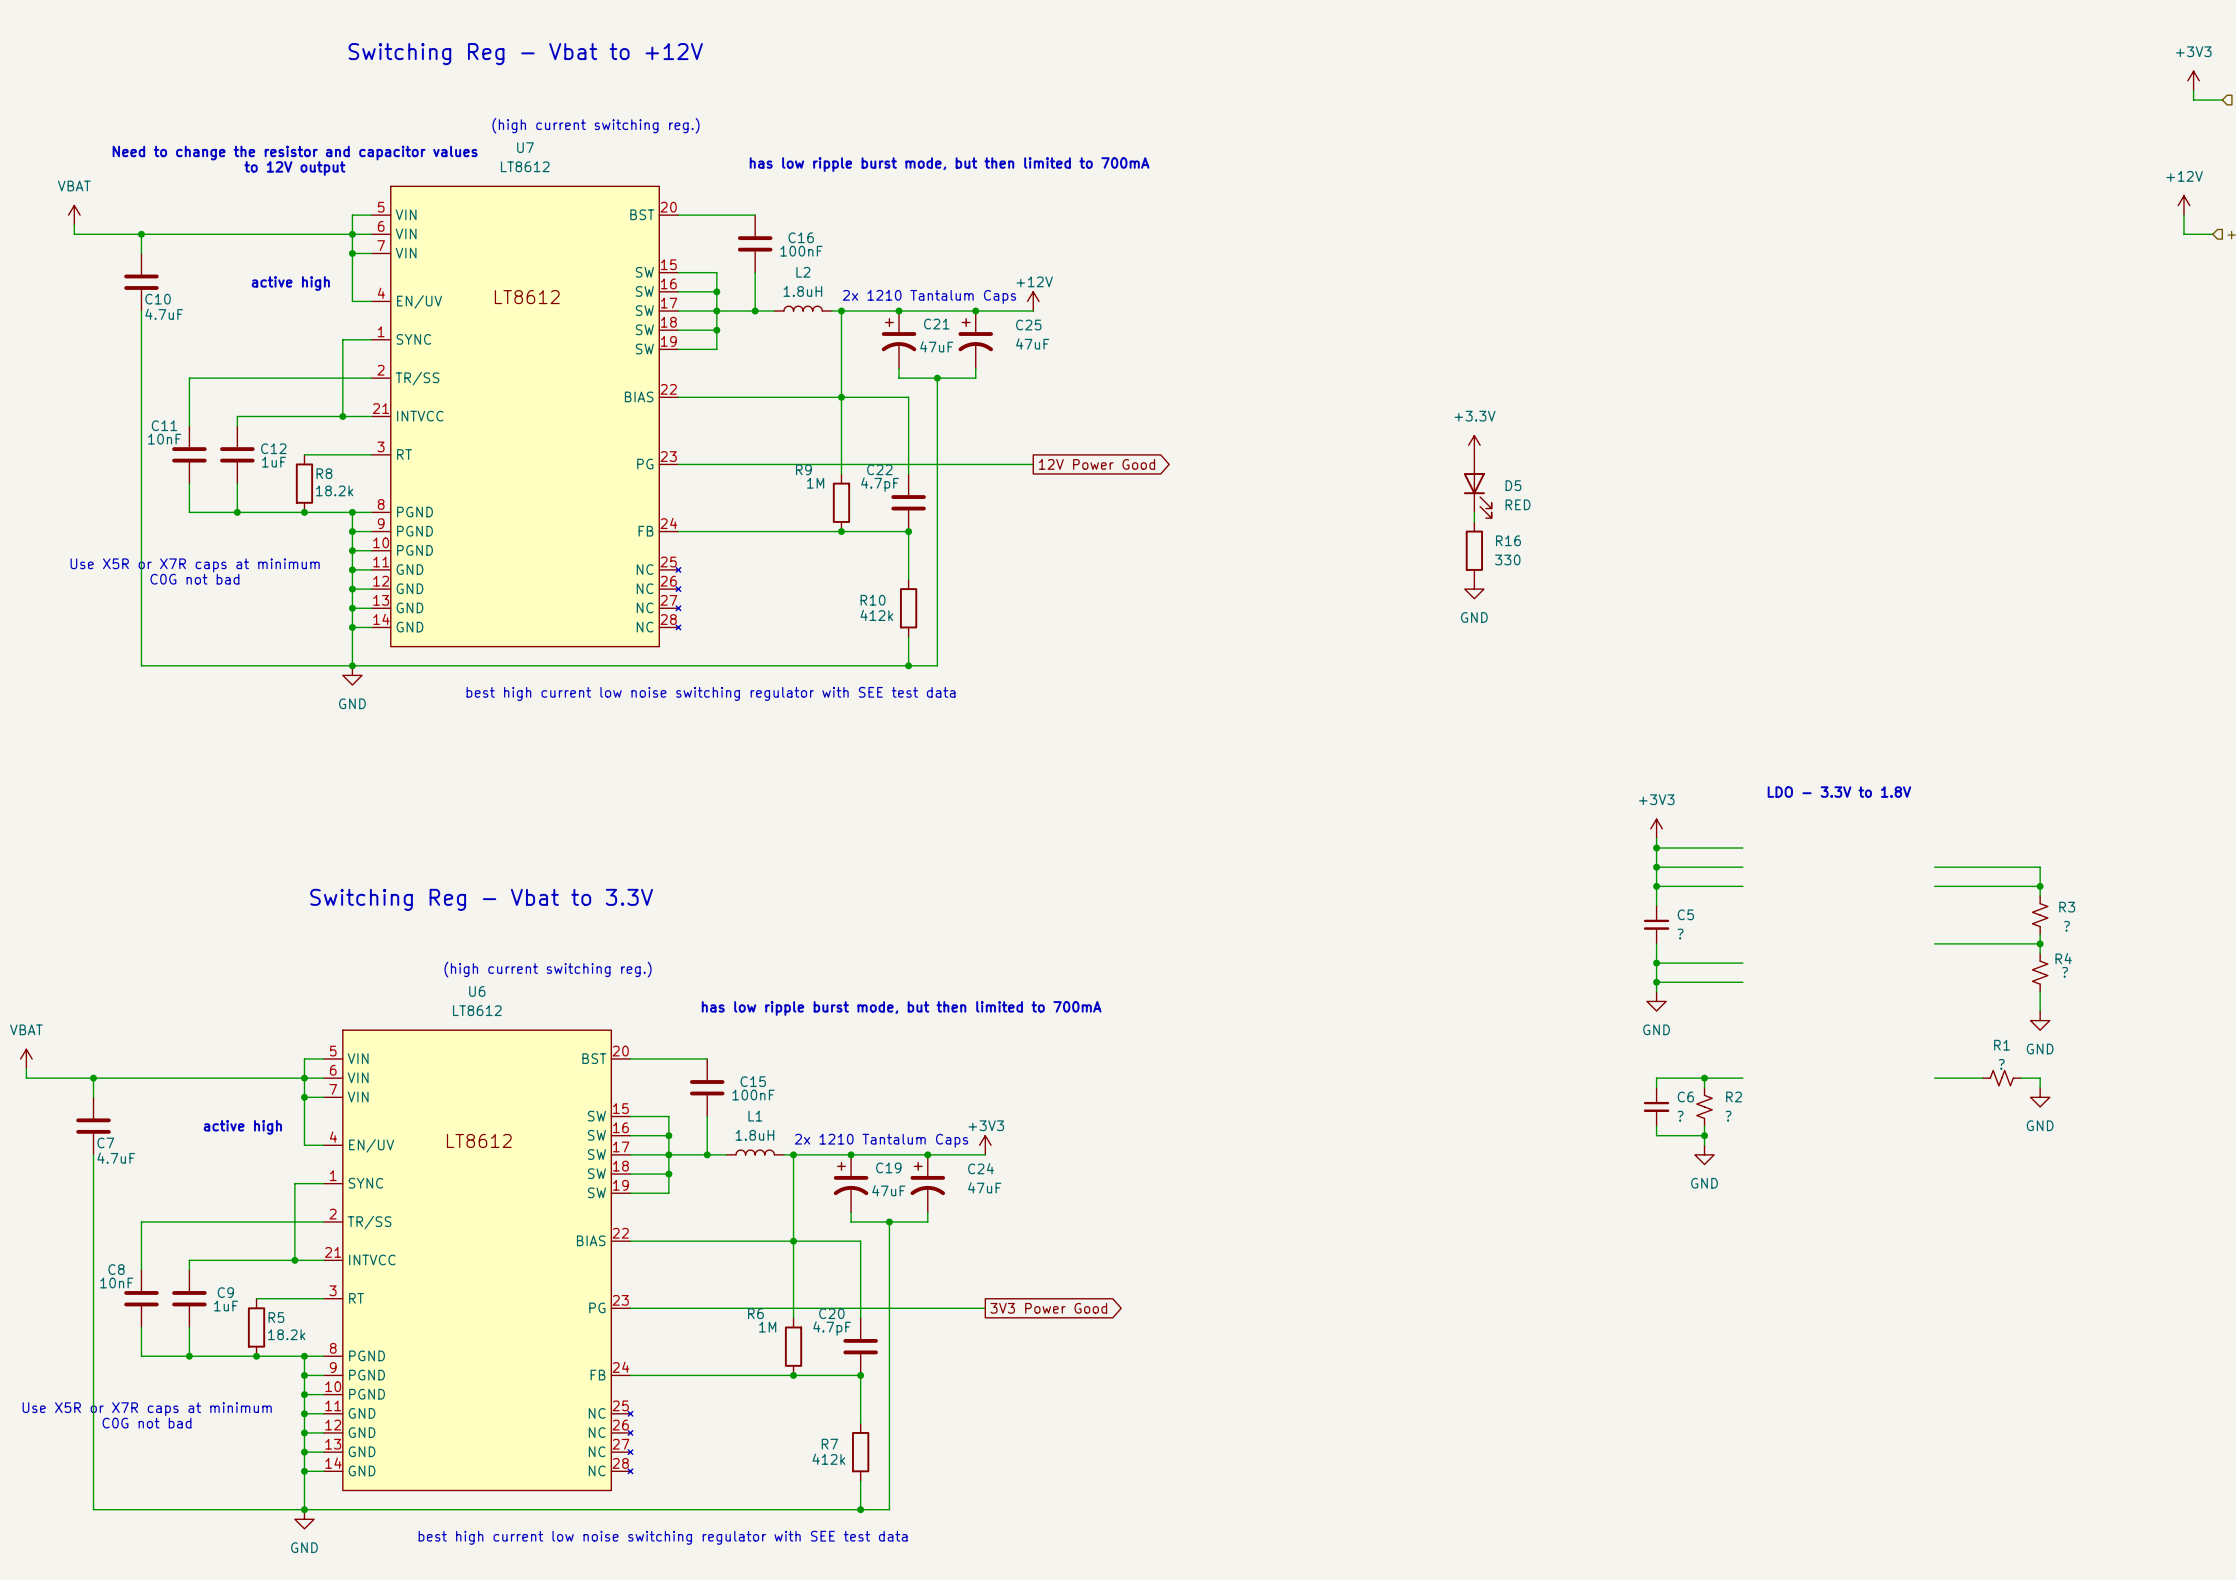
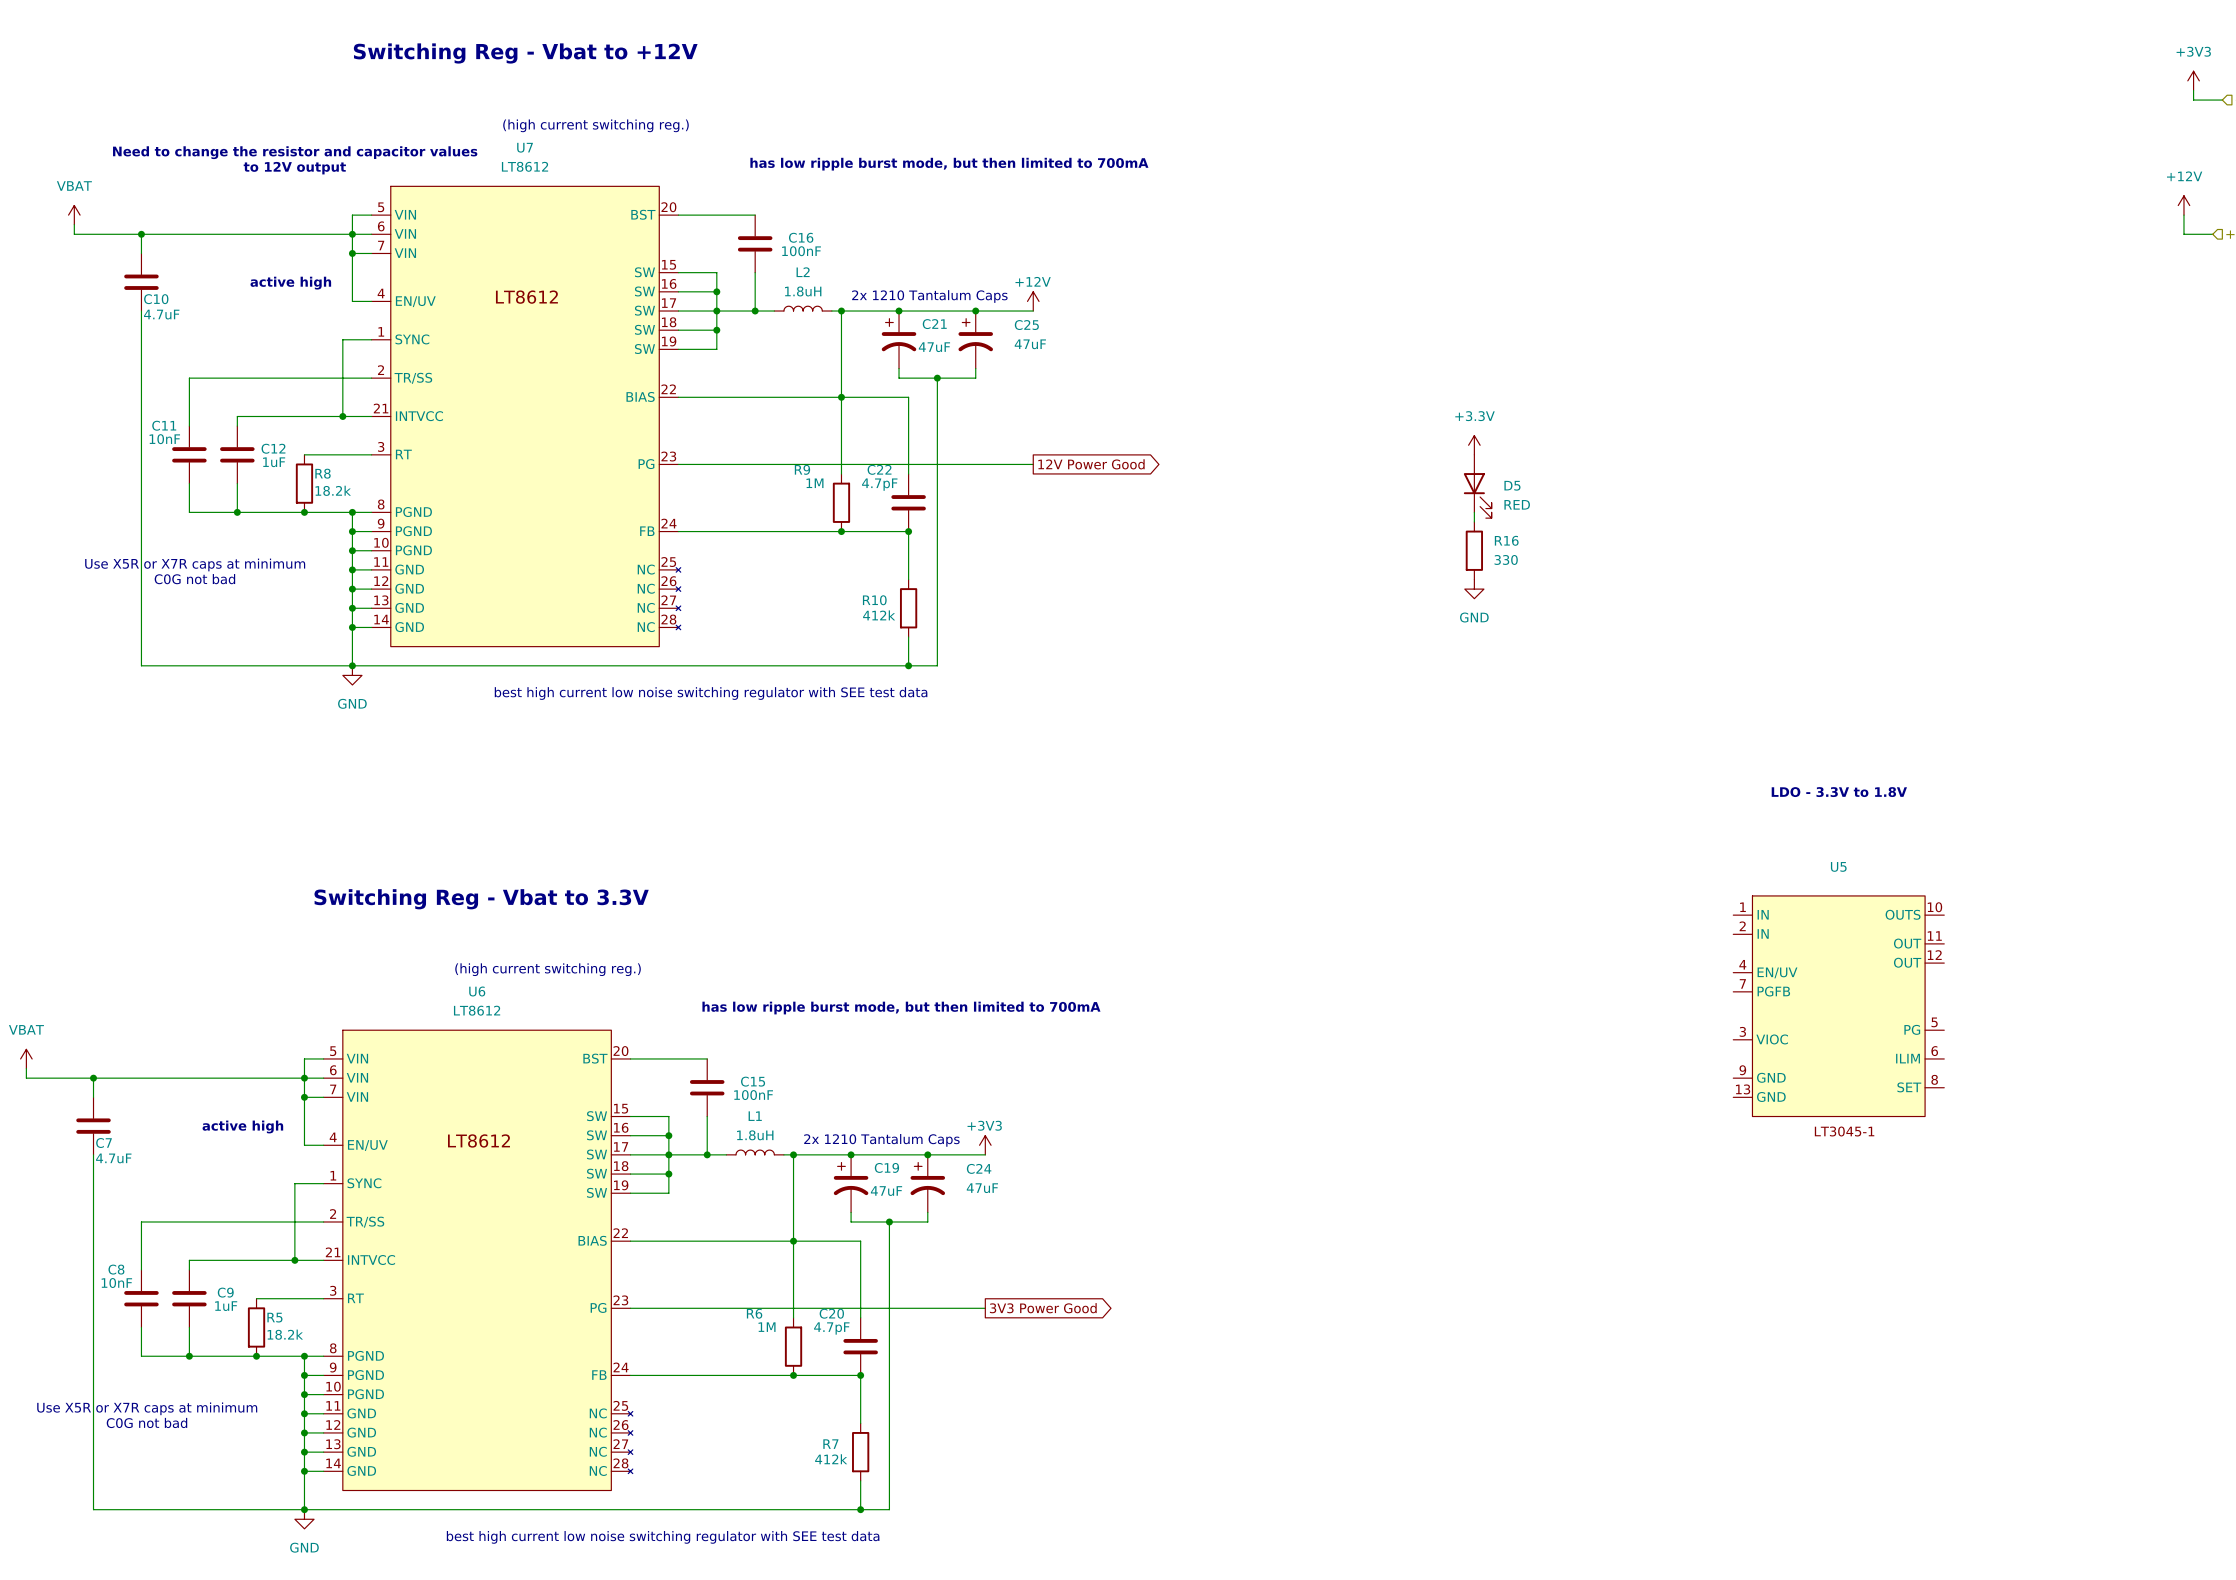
power symbol: +3V3 (1656, 828) -> none
wire: (1656, 838) (1656, 905) -> none
wire: (1656, 848) (1742, 848) -> none
junction: (1656, 848) -> none
wire: (1656, 867) (1742, 867) -> none
junction: (1656, 867) -> none
wire: (1934, 867) (2040, 867) (2040, 895) -> none
wire: (1656, 886) (1742, 886) -> none
junction: (1656, 886) -> none
wire: (1934, 886) (2040, 886) -> none
junction: (2040, 886) -> none
R3: ? (2040, 915) -> none
C5: ? (1656, 924) -> none
wire: (2040, 934) (2040, 953) -> none
wire: (1656, 943) (1656, 991) -> none
wire: (1934, 943) (2040, 943) -> none
junction: (2040, 943) -> none
wire: (1656, 963) (1742, 963) -> none
junction: (1656, 963) -> none
R4: ? (2040, 972) -> none
wire: (1656, 982) (1742, 982) -> none
junction: (1656, 982) -> none
wire: (2040, 991) (2040, 1011) -> none
power symbol: GND (1656, 1001) -> none
U5: none -> (1838, 1006)
power symbol: GND (2040, 1020) -> none
wire: (1704, 1078) (1704, 1087) -> none
junction: (1704, 1078) -> none
wire: (1742, 1078) (1656, 1078) (1656, 1087) -> none
wire: (1934, 1078) (1982, 1078) -> none
R1: ? (2001, 1078) -> none
wire: (2020, 1078) (2040, 1078) (2040, 1087) -> none
power symbol: GND (2040, 1097) -> none
C6: ? (1656, 1106) -> none
R2: ? (1704, 1106) -> none
wire: (1656, 1126) (1656, 1135) (1704, 1135) -> none
wire: (1704, 1126) (1704, 1145) -> none
junction: (1704, 1135) -> none
power symbol: GND (1704, 1154) -> none

